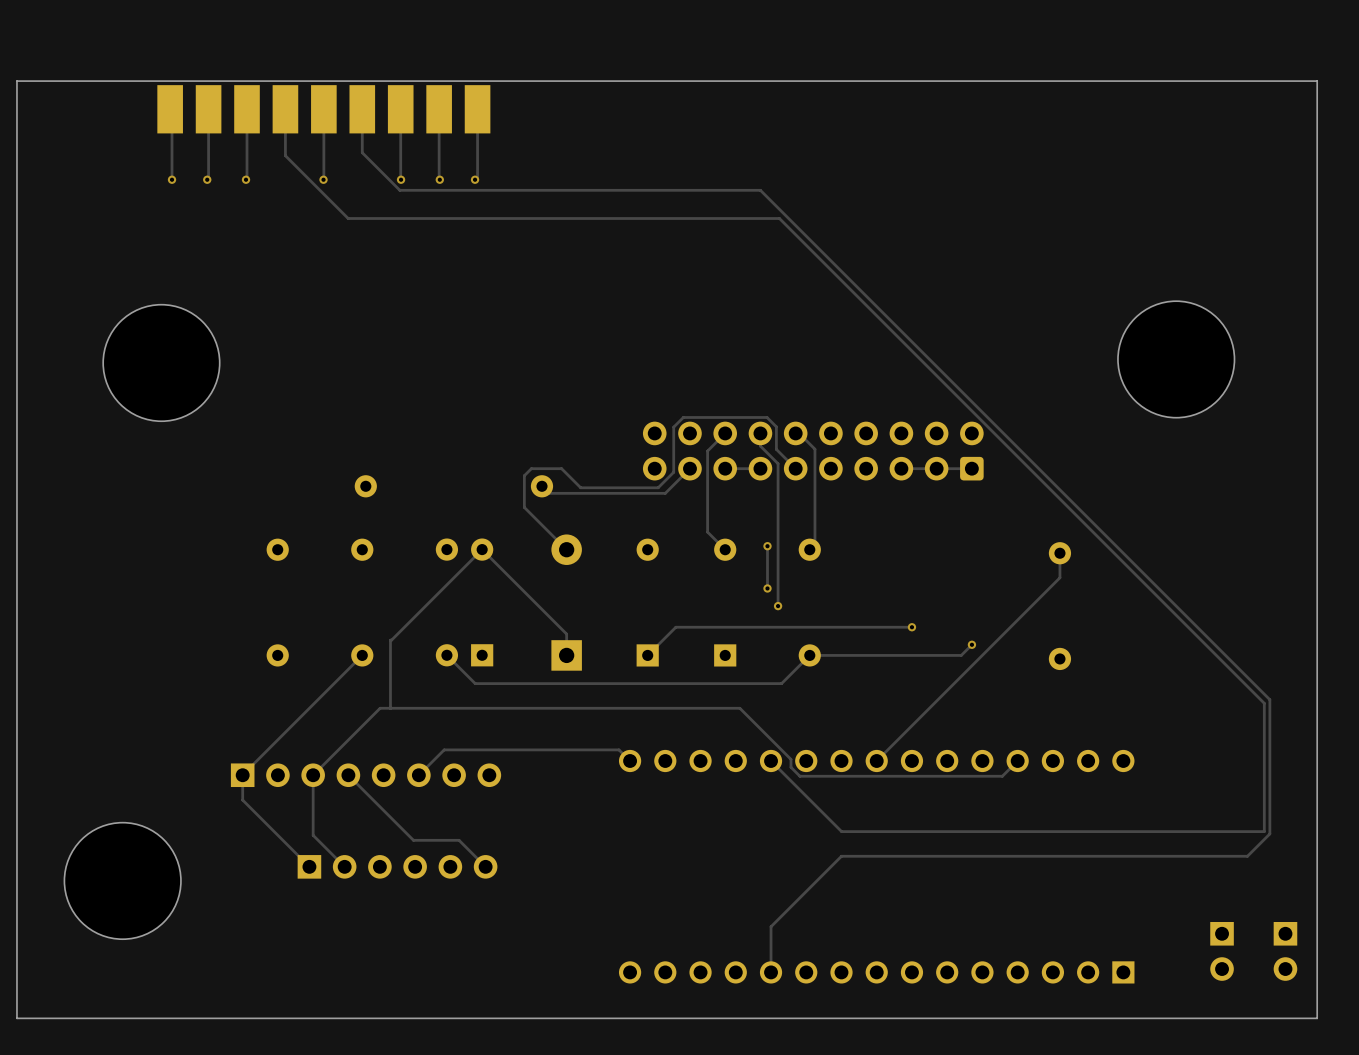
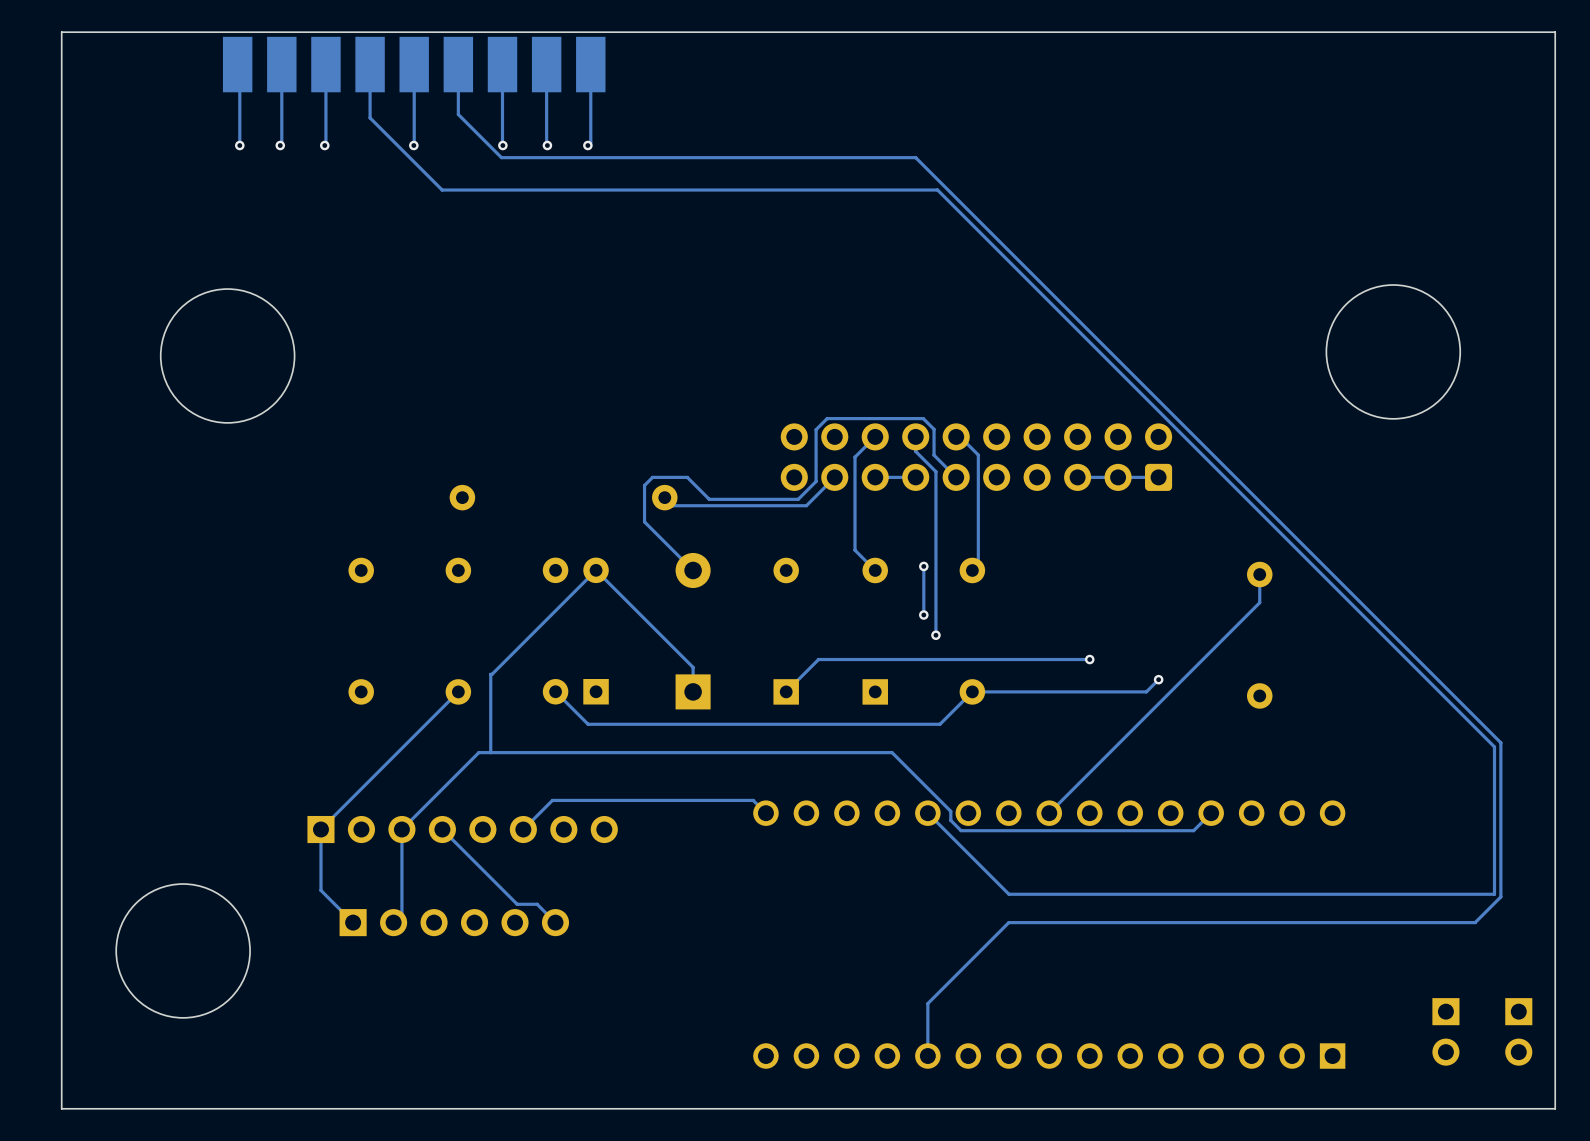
track: (242, 800) (309, 866) -> (320, 858) (320, 890) (353, 922)
track: (313, 835) (344, 866) -> (401, 898) (401, 914) (393, 922)
track: (430, 840) (459, 840) (485, 866) -> (537, 904) (555, 922)
part position: (397, 866) -> (454, 922)

